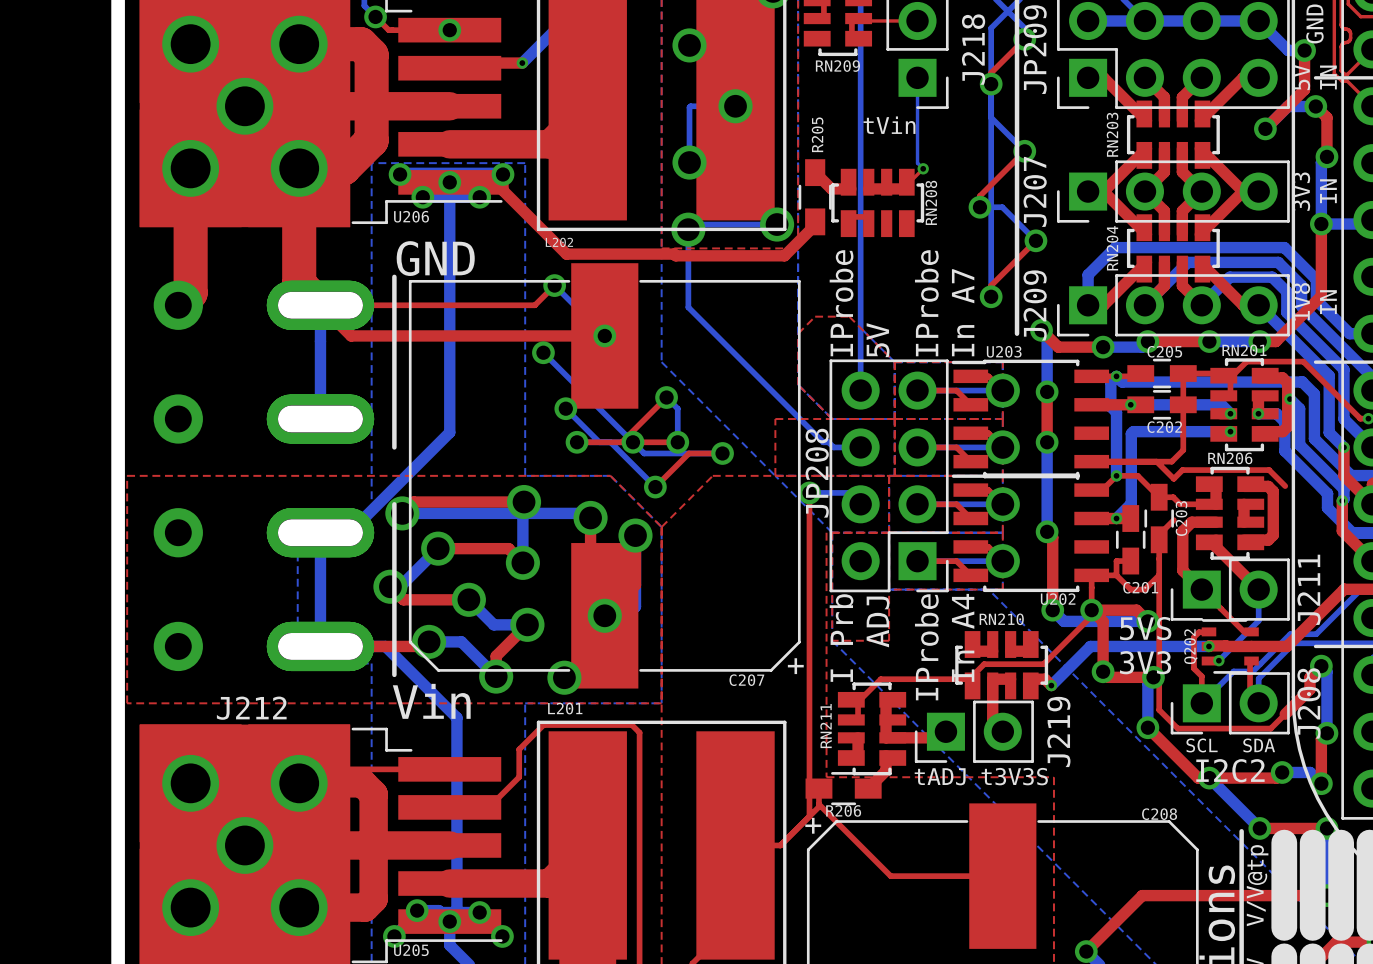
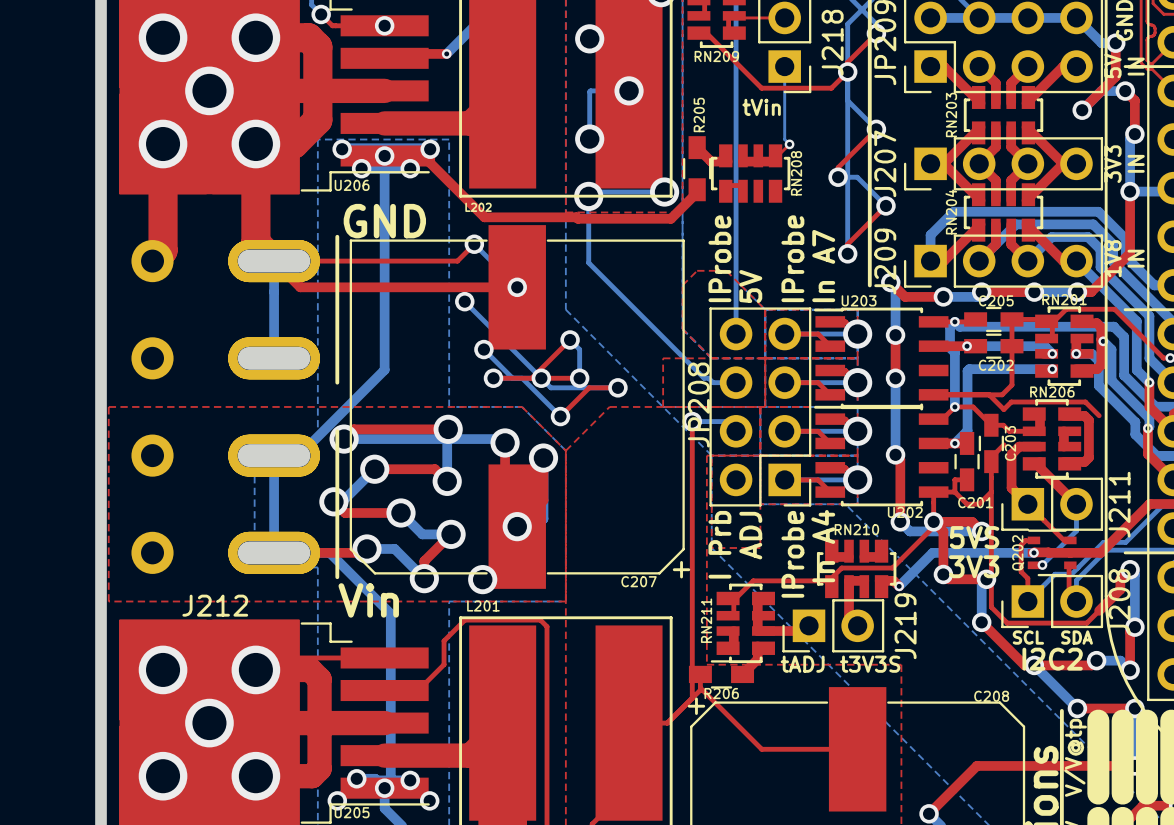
top track: none -> (704, 31) (761, 88) (831, 88) (847, 71)

